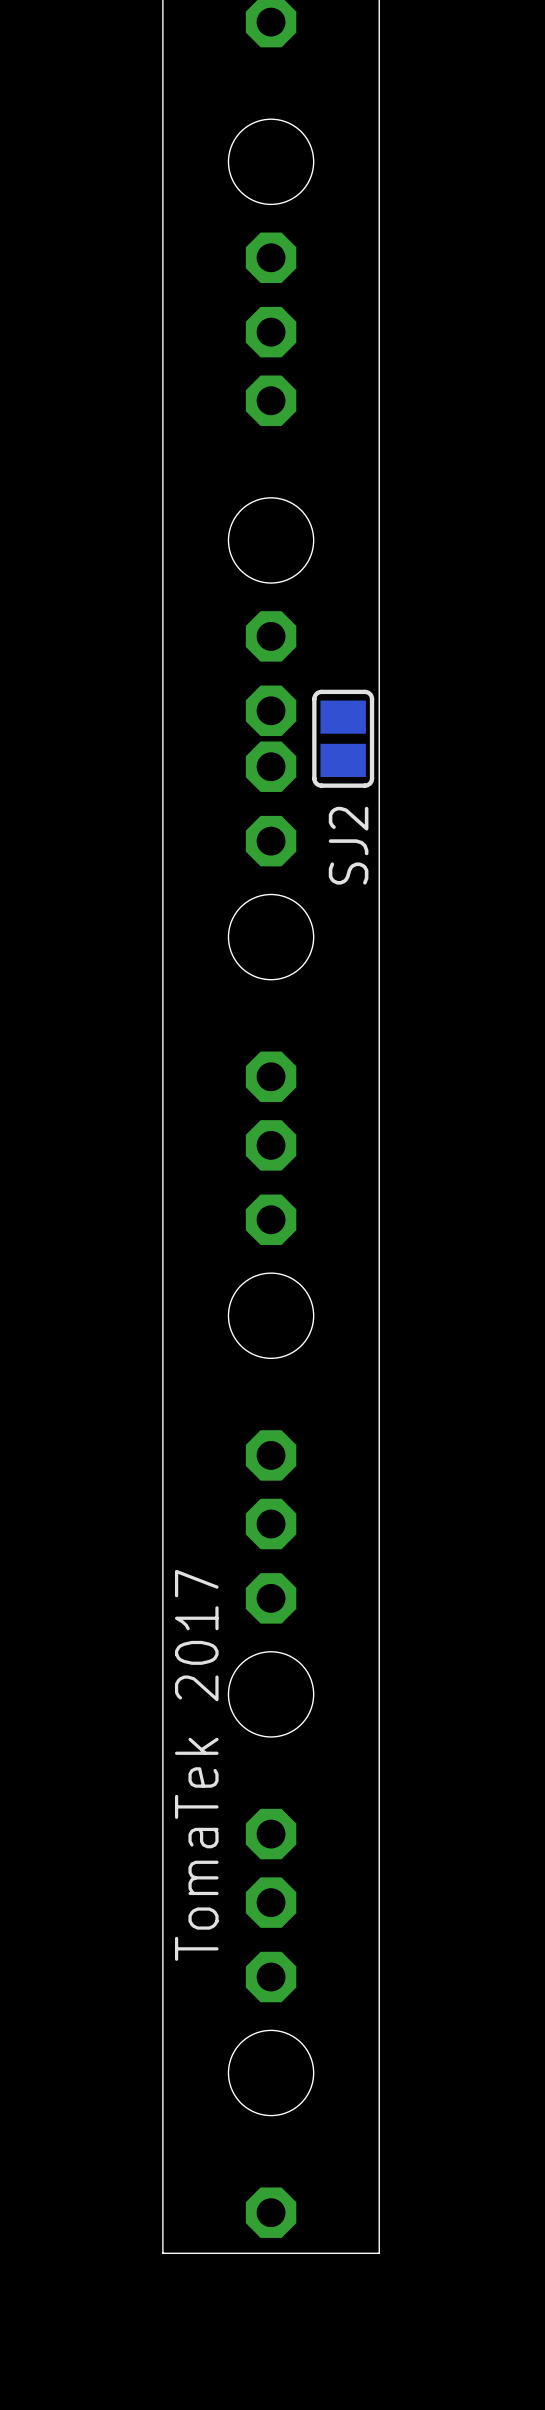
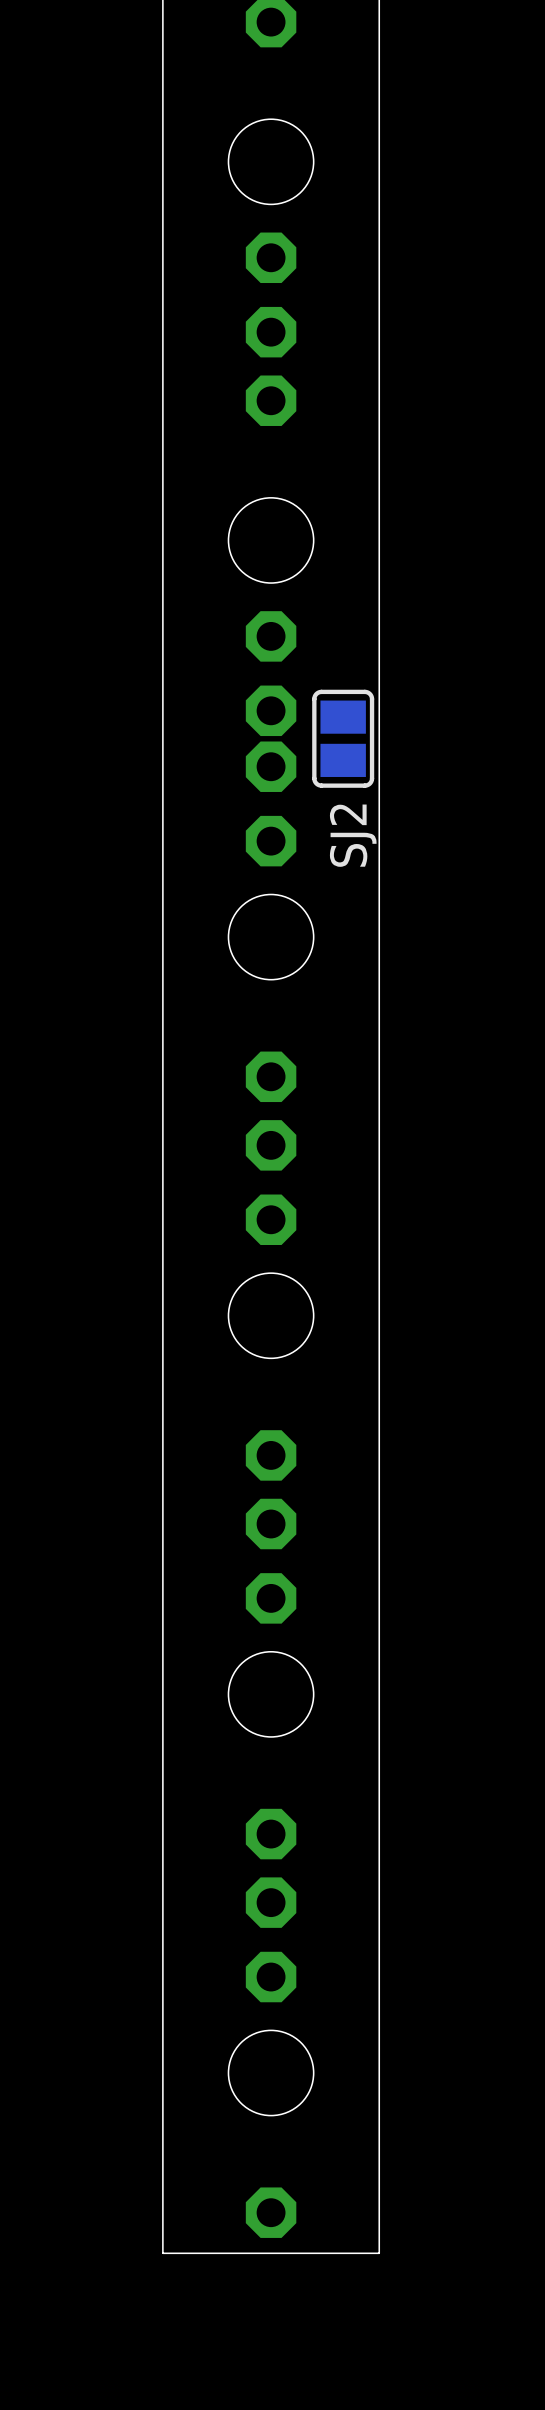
text: TomaTek 2017 (196, 1765) -> none

